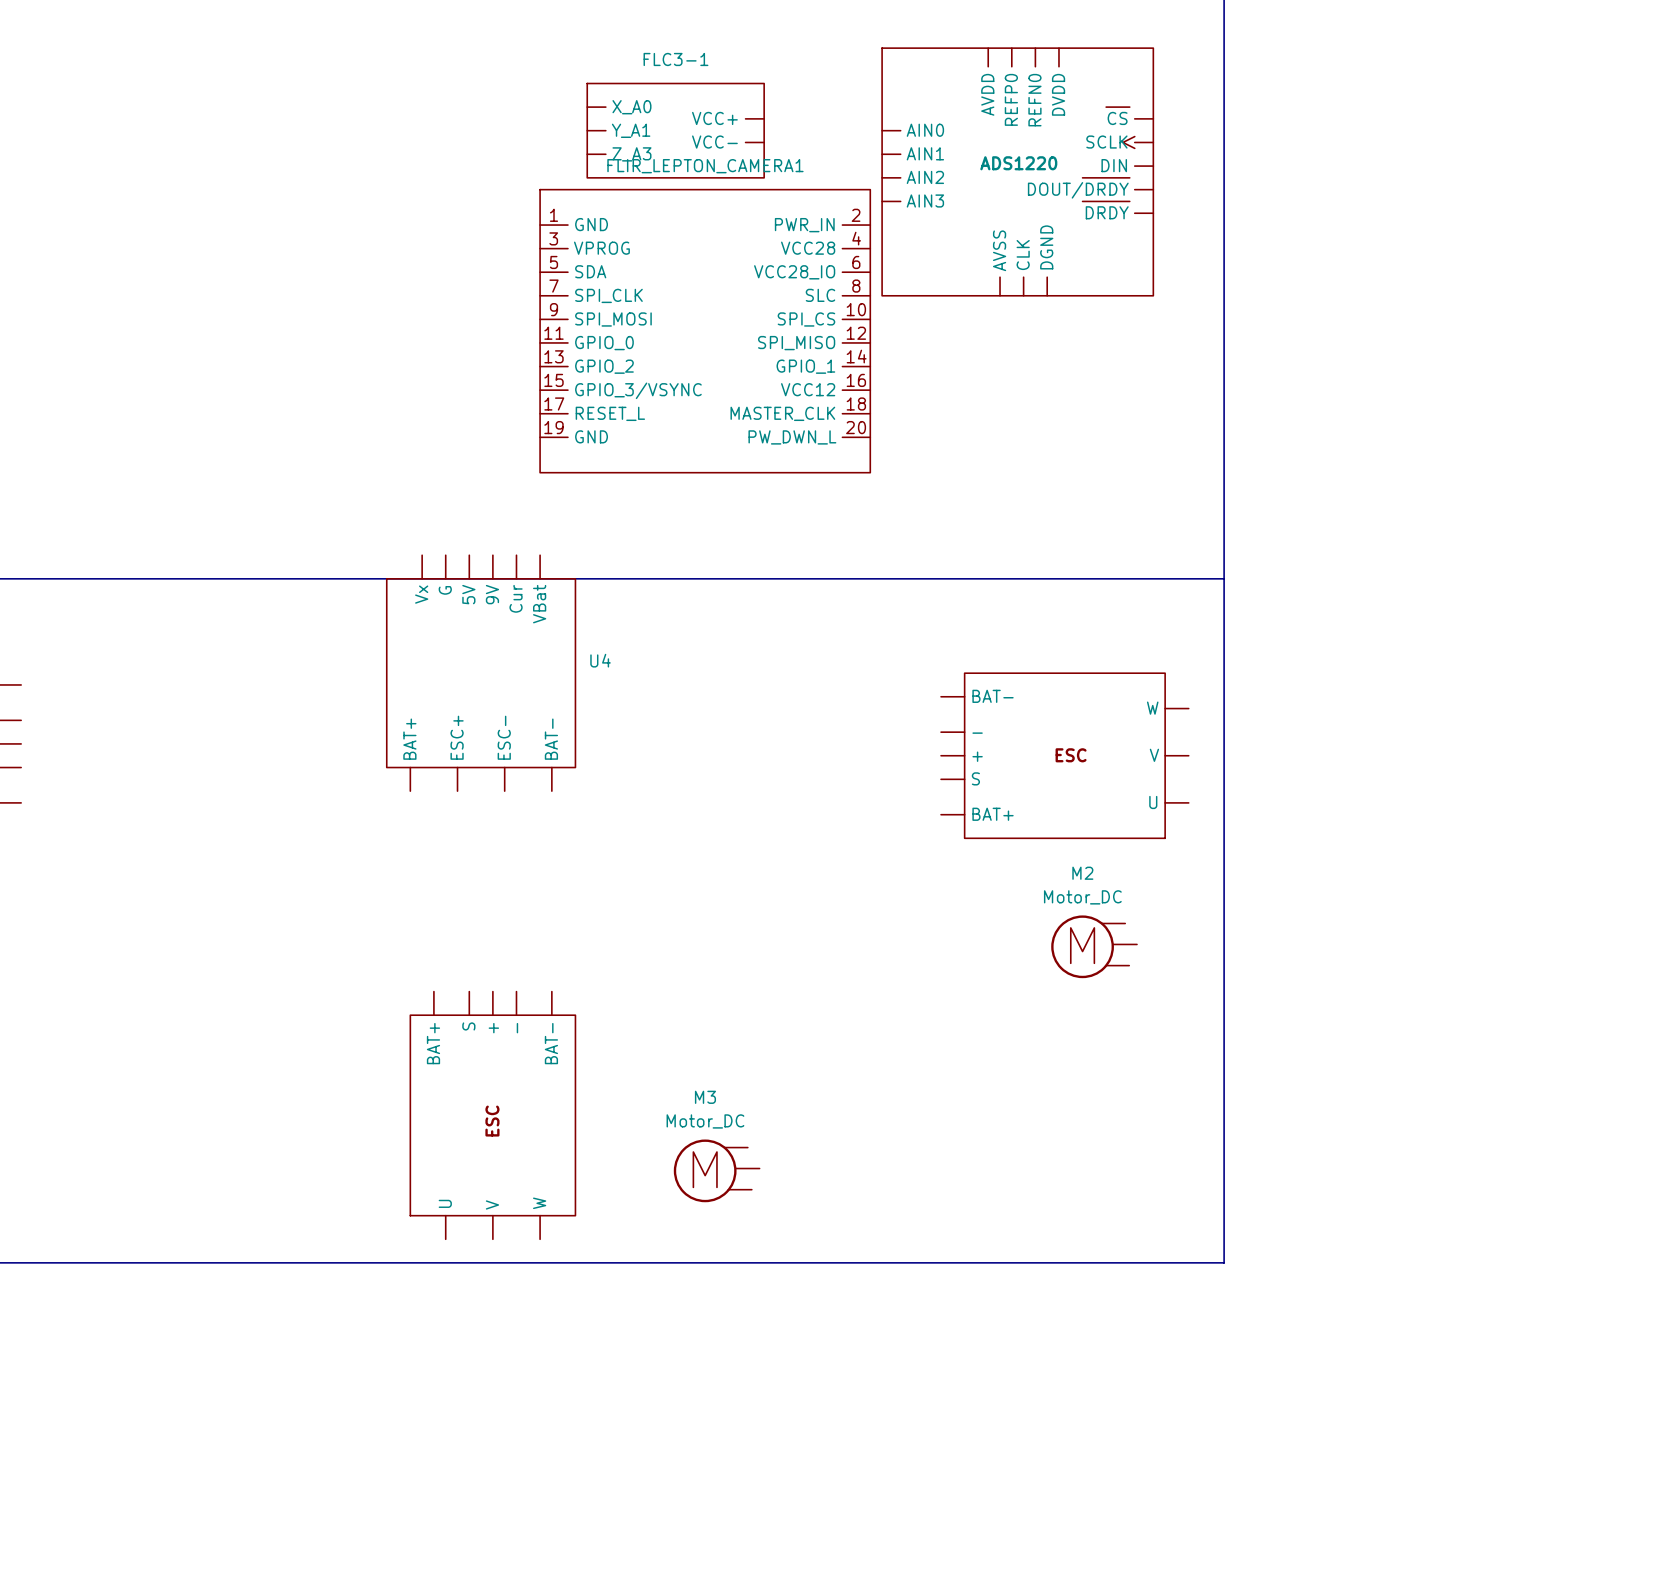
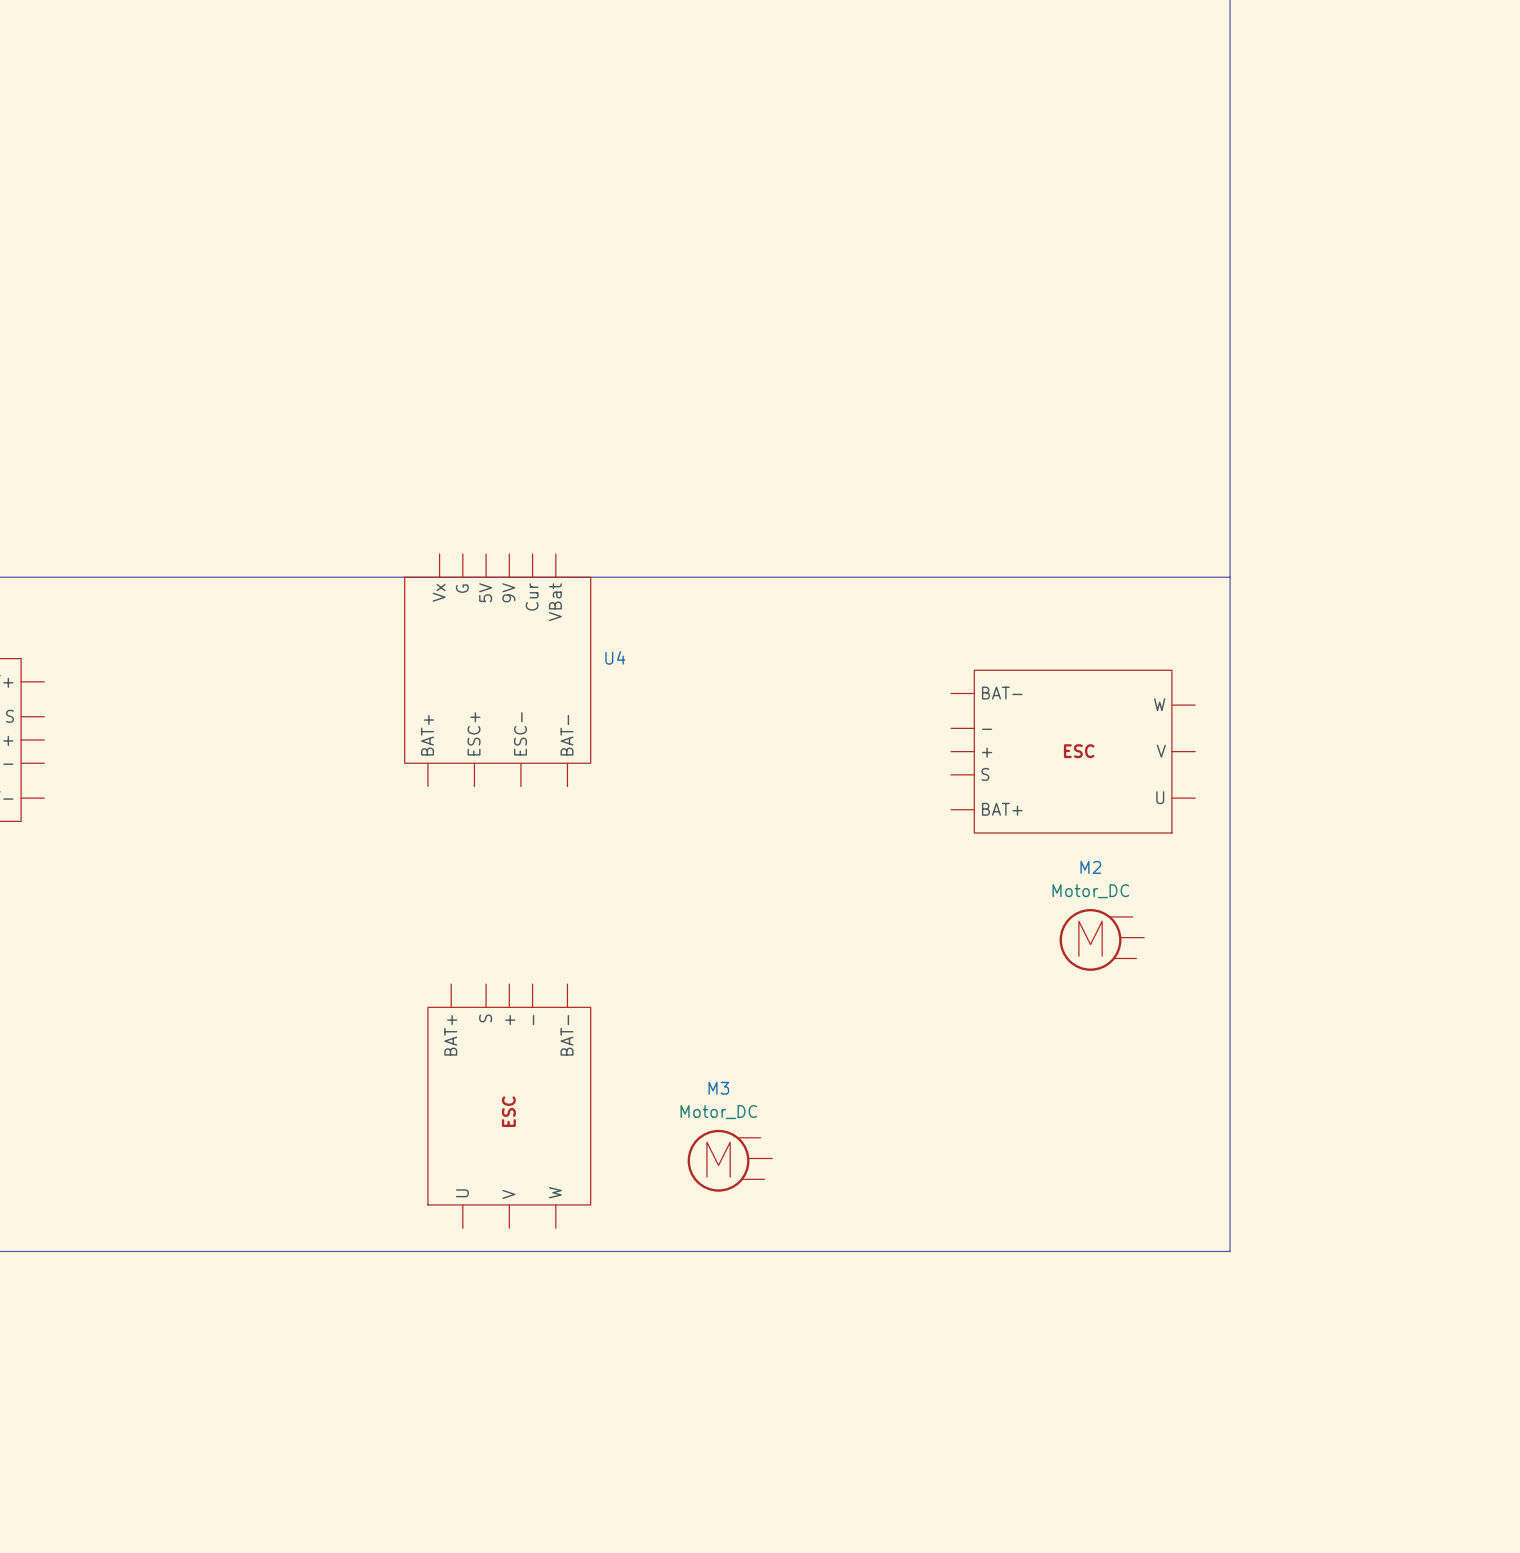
FLC3-1: (675, 130) -> none
ADS1220: (1017, 171) -> none
FLIR_LEPTON_CAMERA1: (705, 331) -> none

